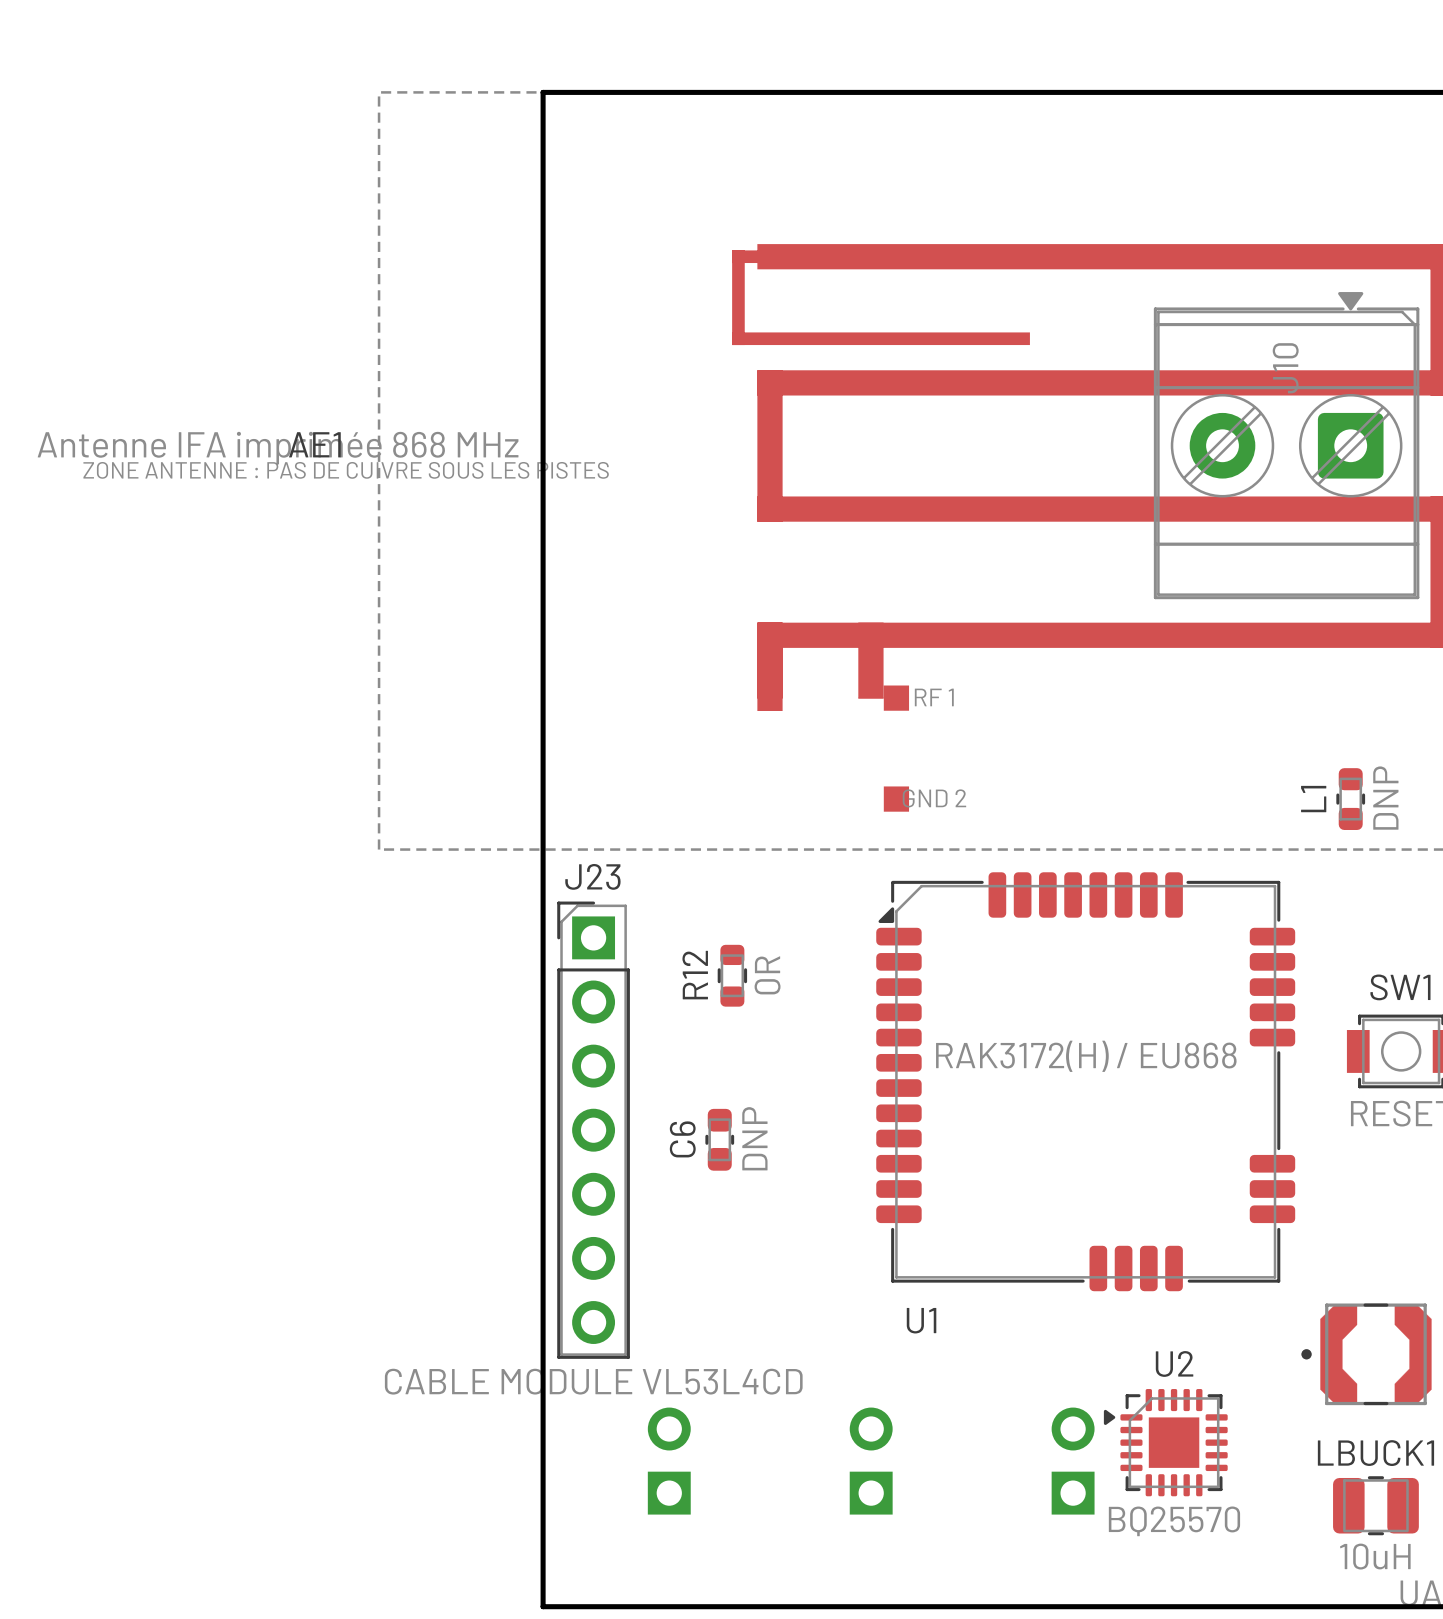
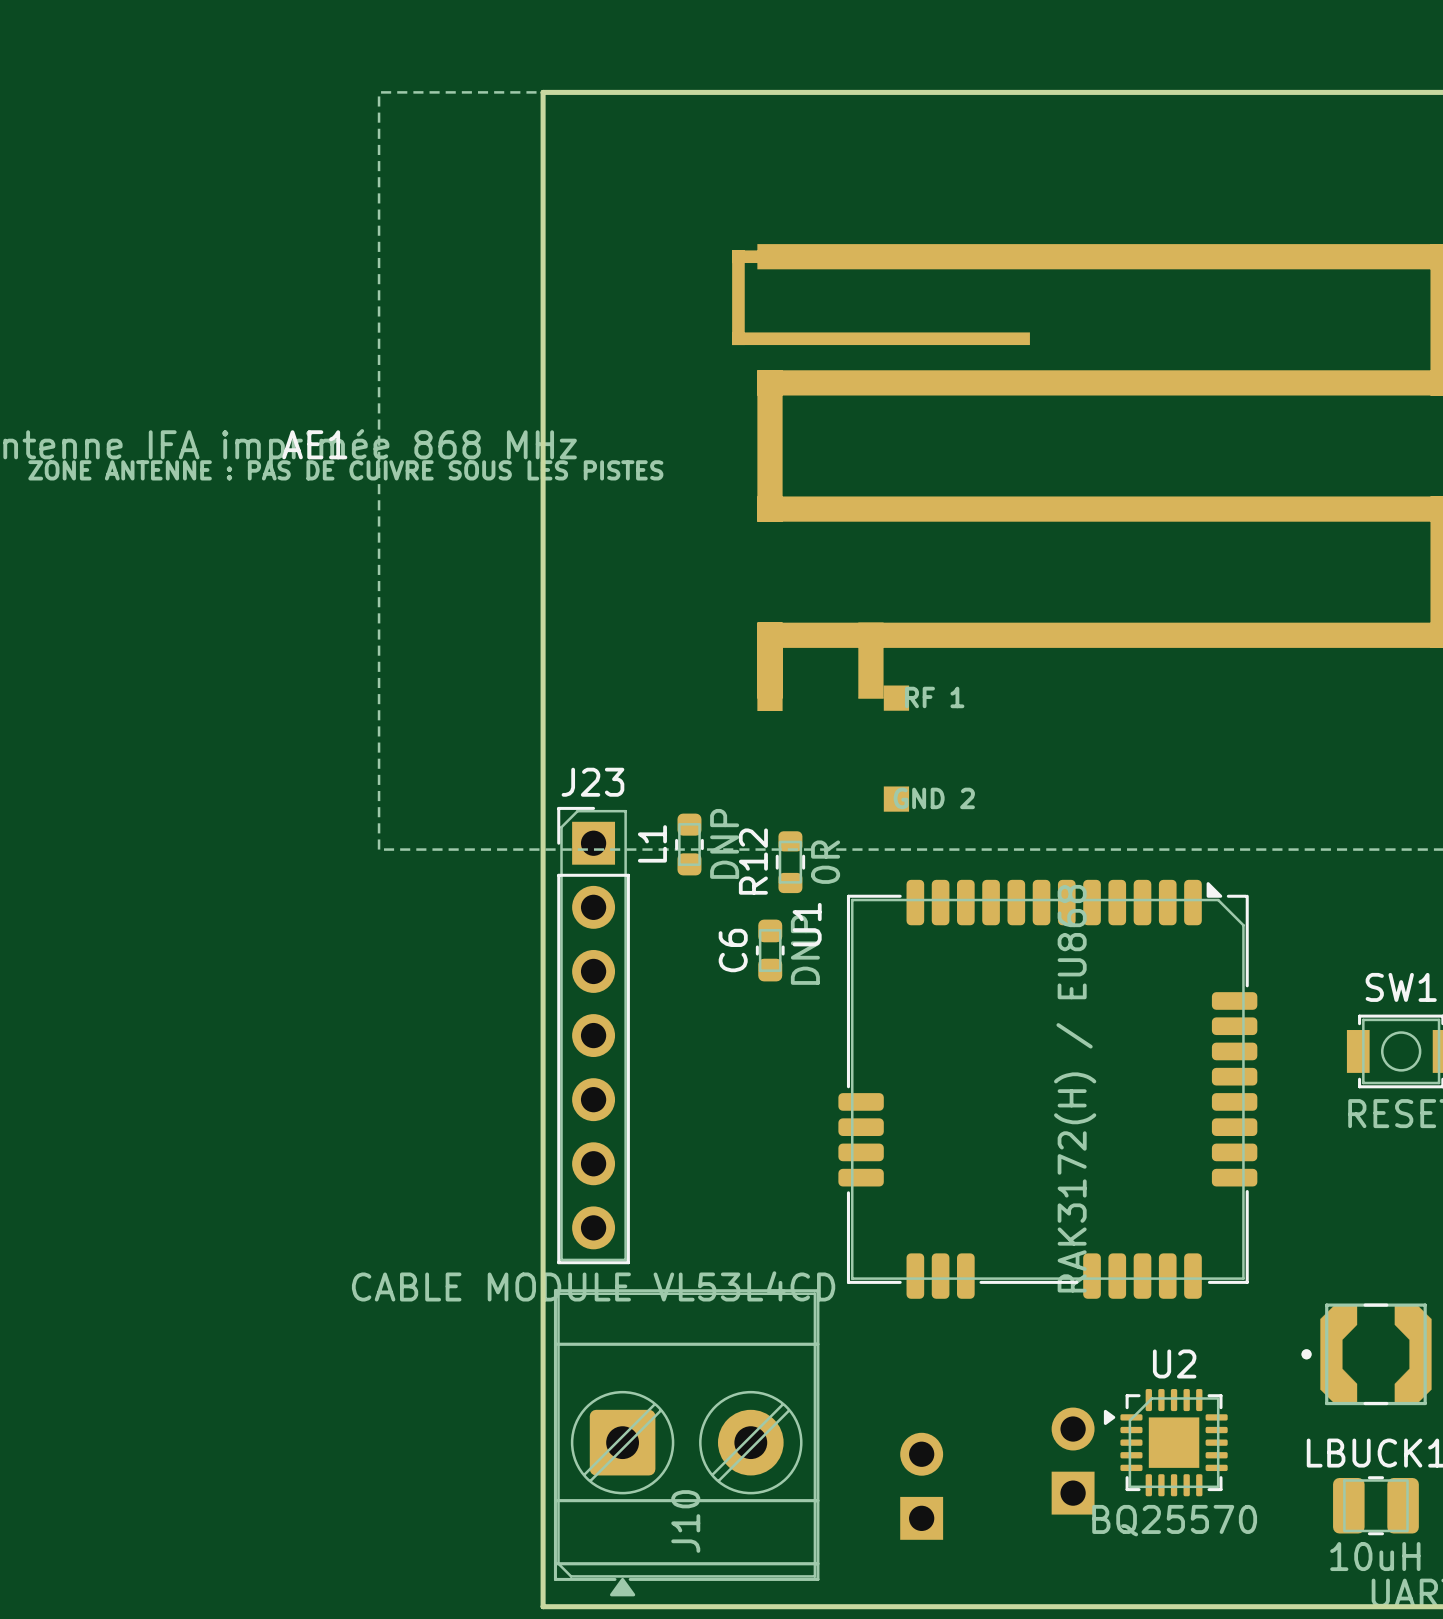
J10 rotation: 0° (1286, 445) -> 180° (686, 1442)
J10 position: (1286, 445) -> (686, 1442)
L1 position: (1350, 799) -> (689, 844)
R12 position: (732, 975) -> (790, 862)
U1 rotation: 0° (1085, 1081) -> 90° clockwise (1047, 1089)
J23 position: (593, 1130) -> (593, 1035)
C6 position: (719, 1139) -> (770, 950)
part: (669, 1461) -> none
part position: (871, 1461) -> (921, 1486)

